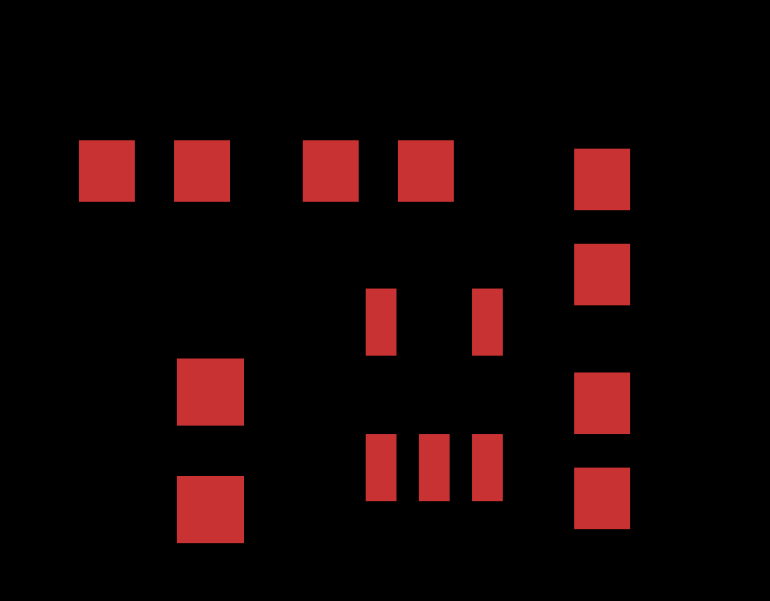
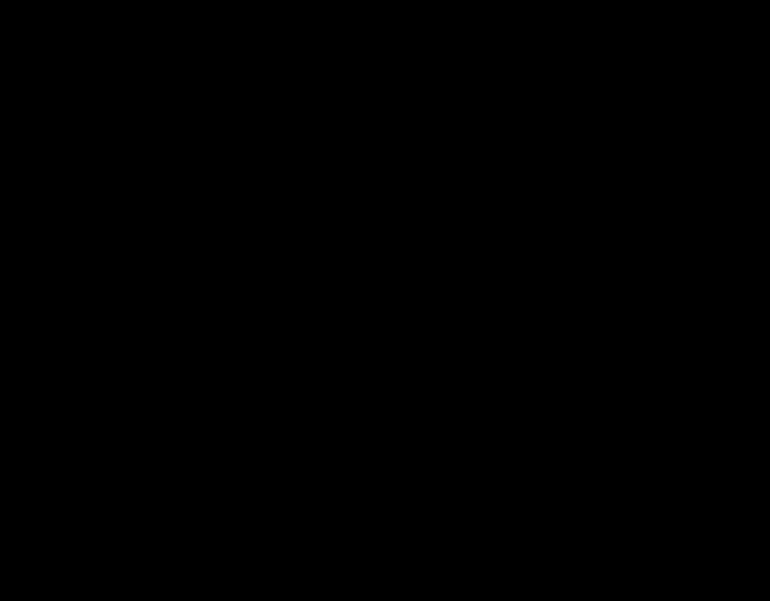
part: (154, 171) -> none
part: (378, 171) -> none
part: (602, 226) -> none
part: (434, 394) -> none
part: (210, 450) -> none
part: (602, 450) -> none

